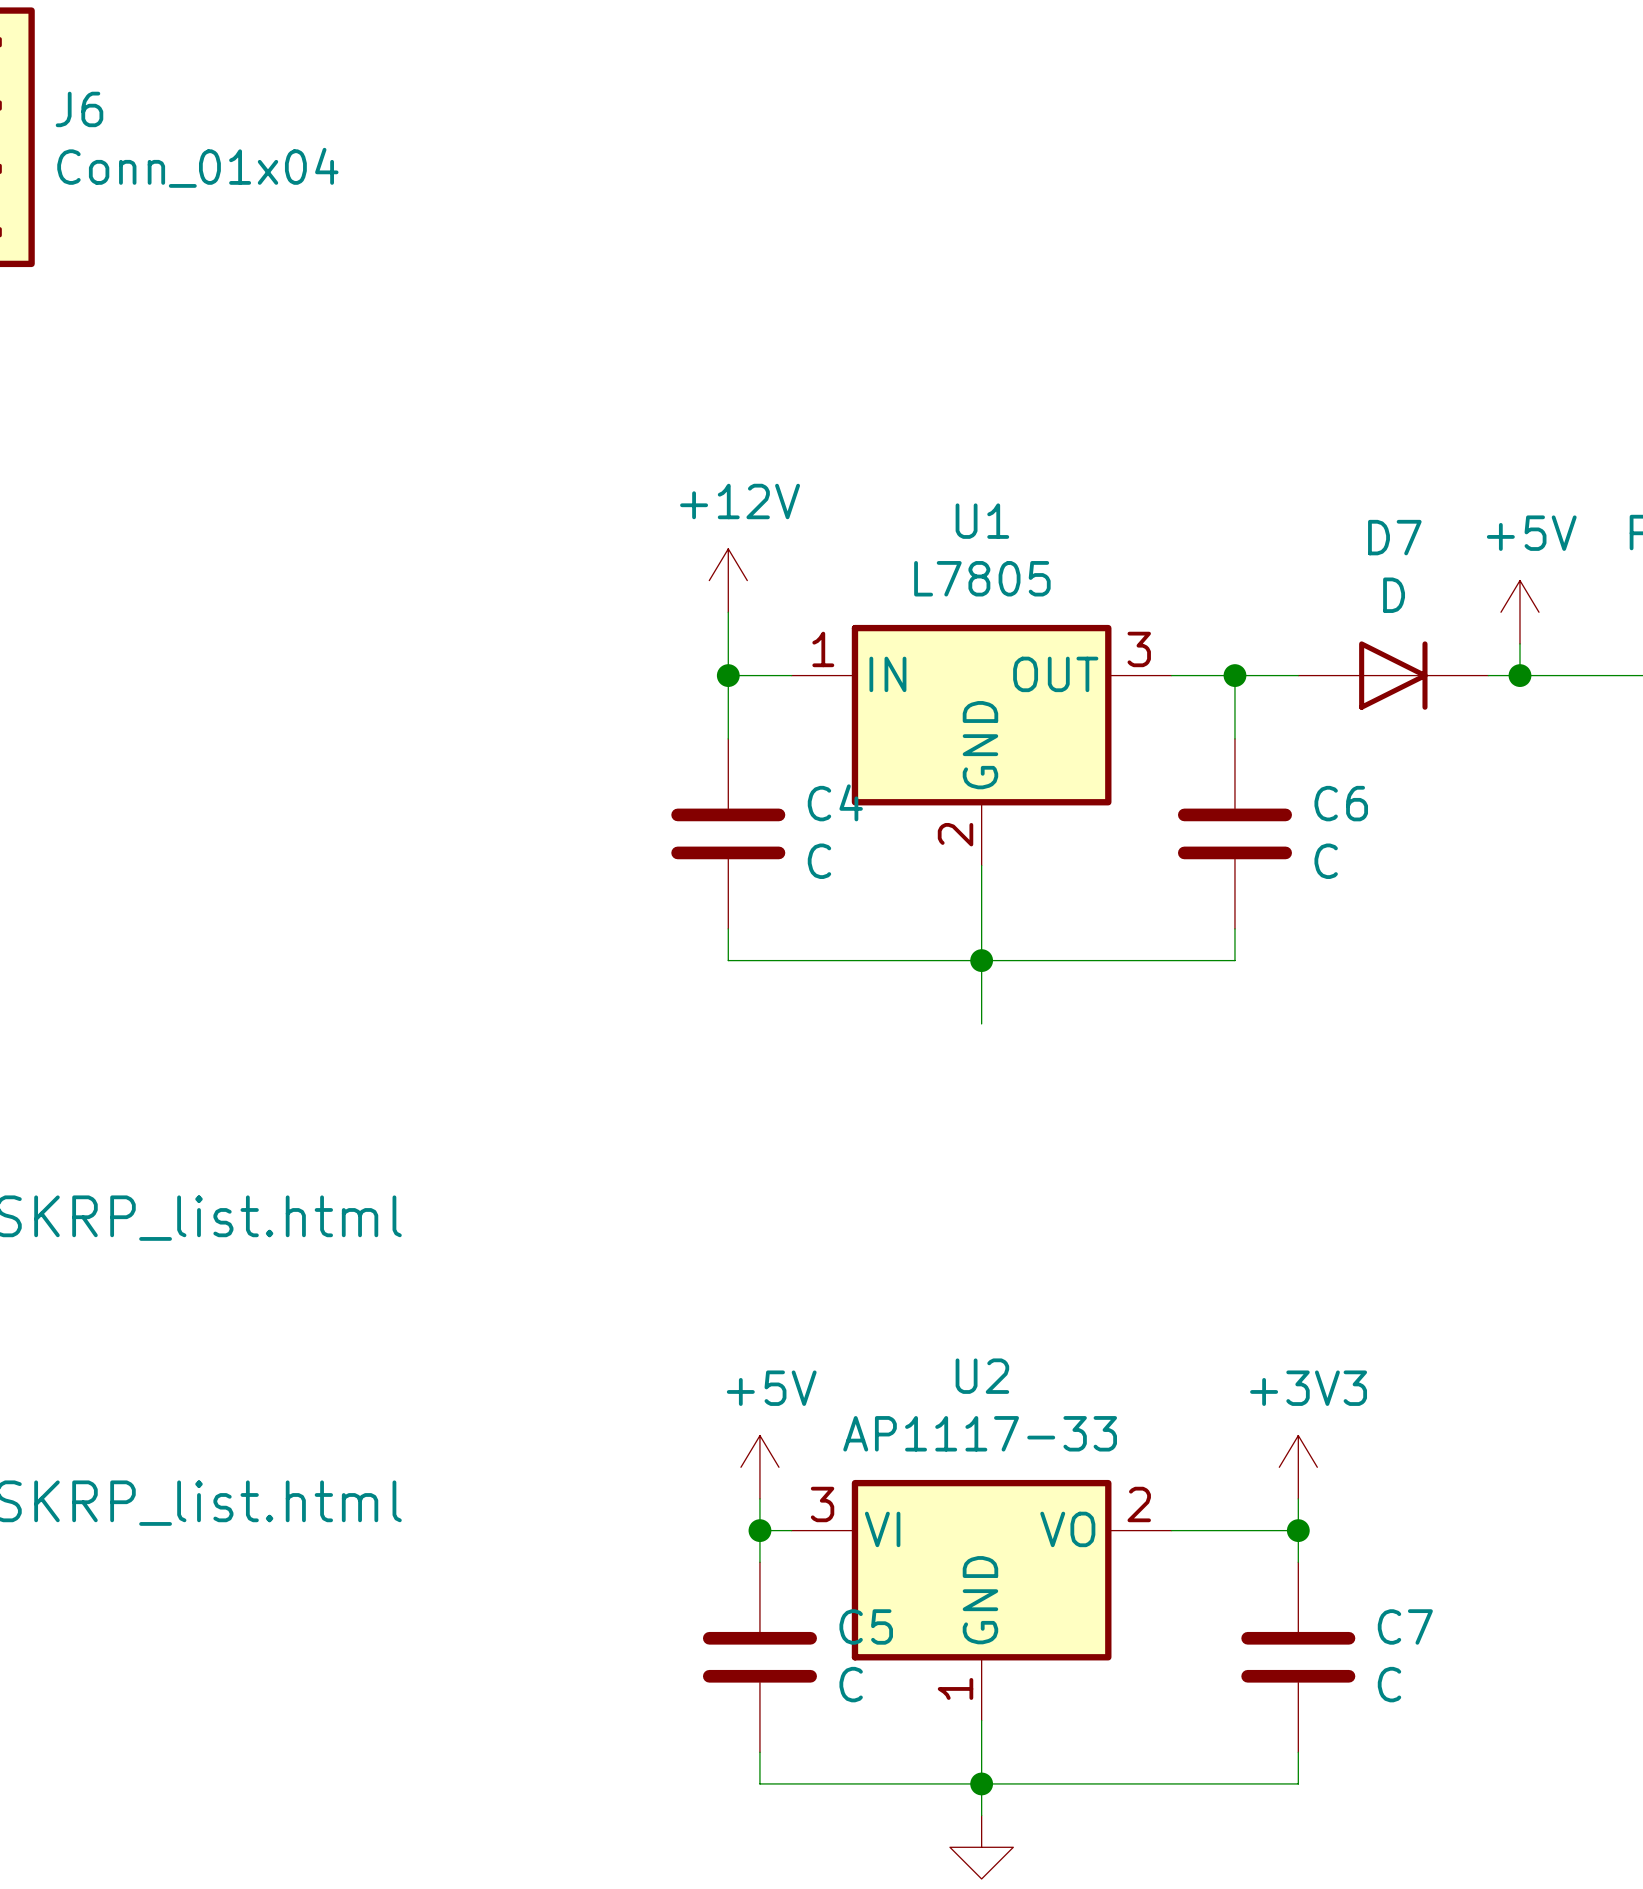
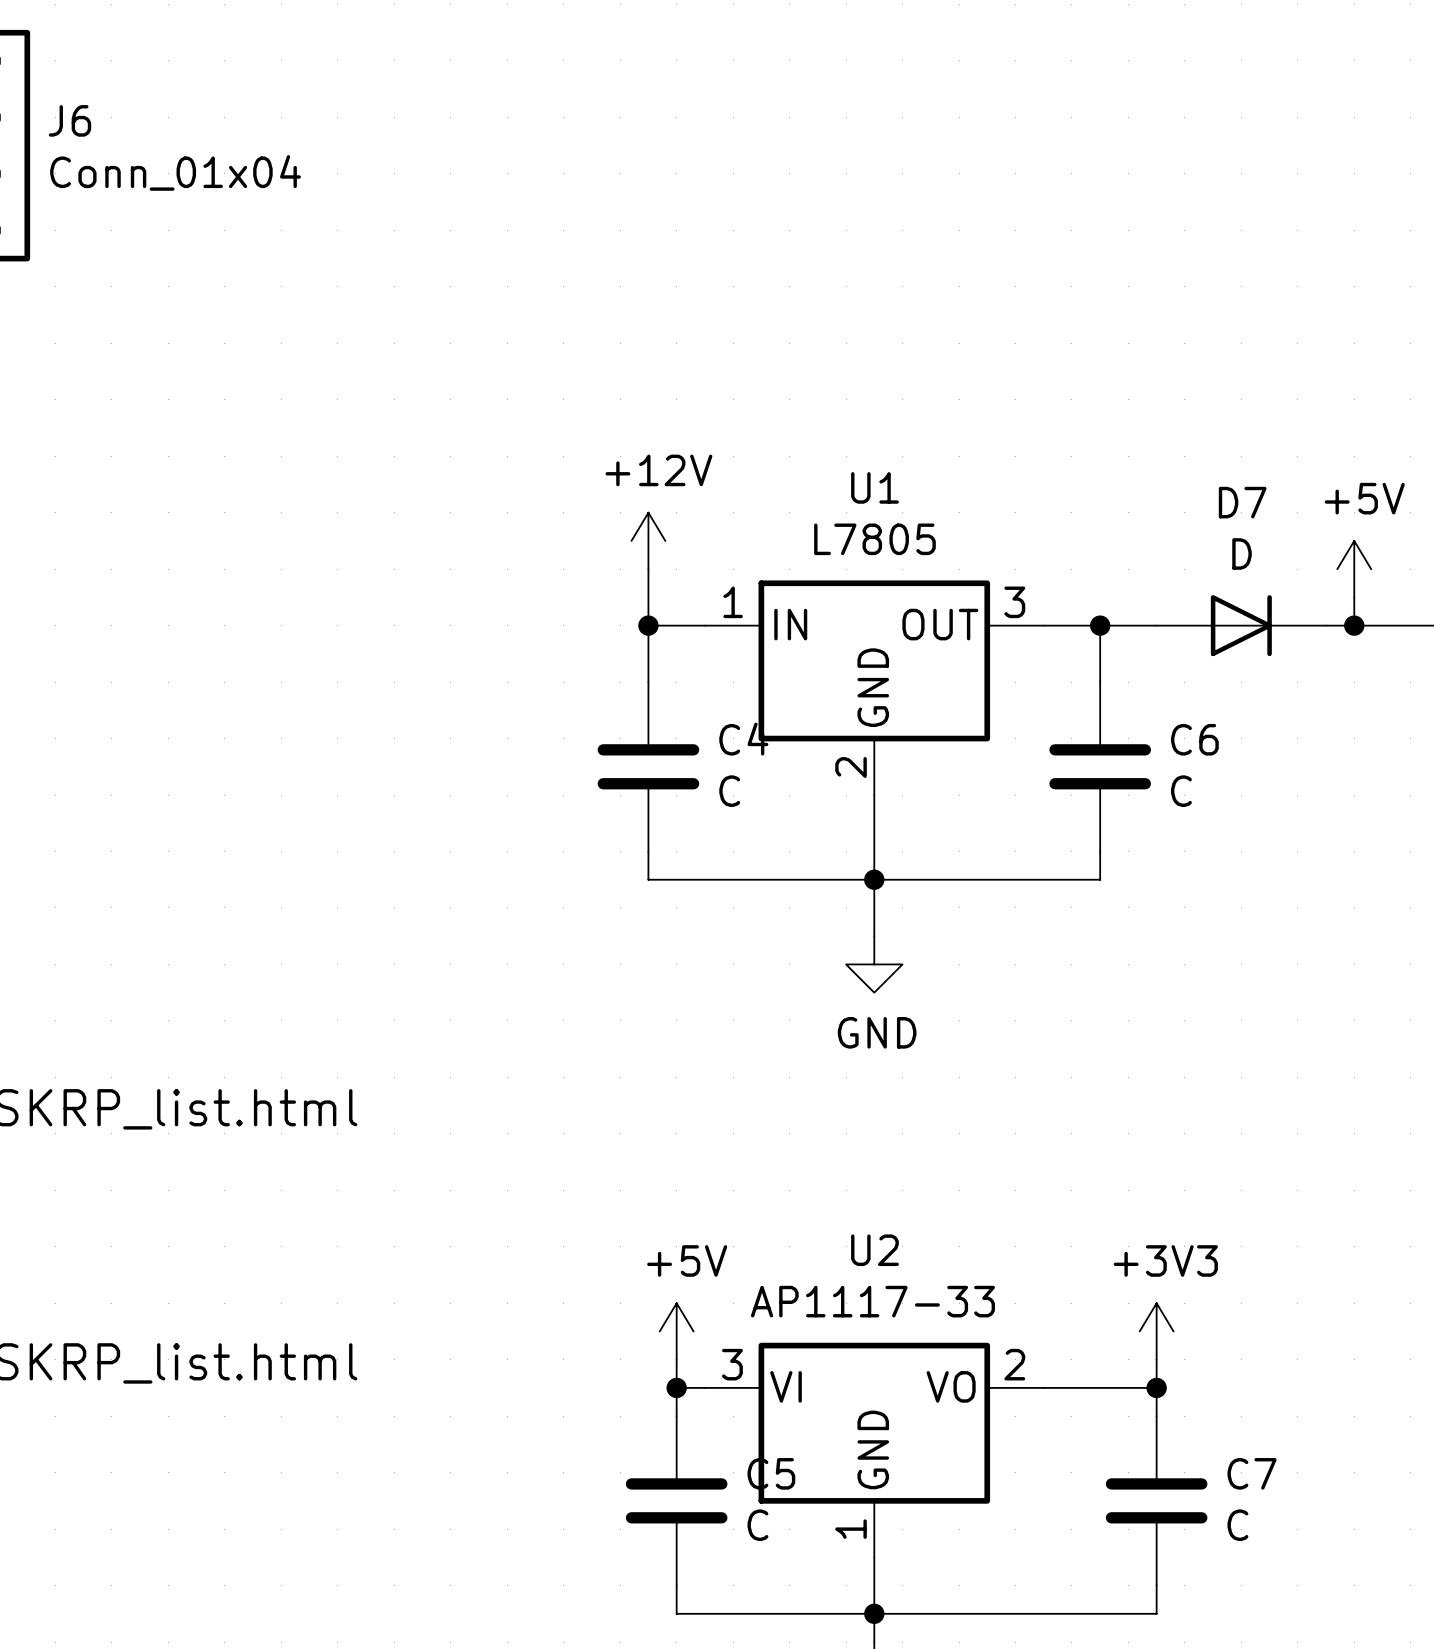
power symbol: none -> GND (874, 964)

